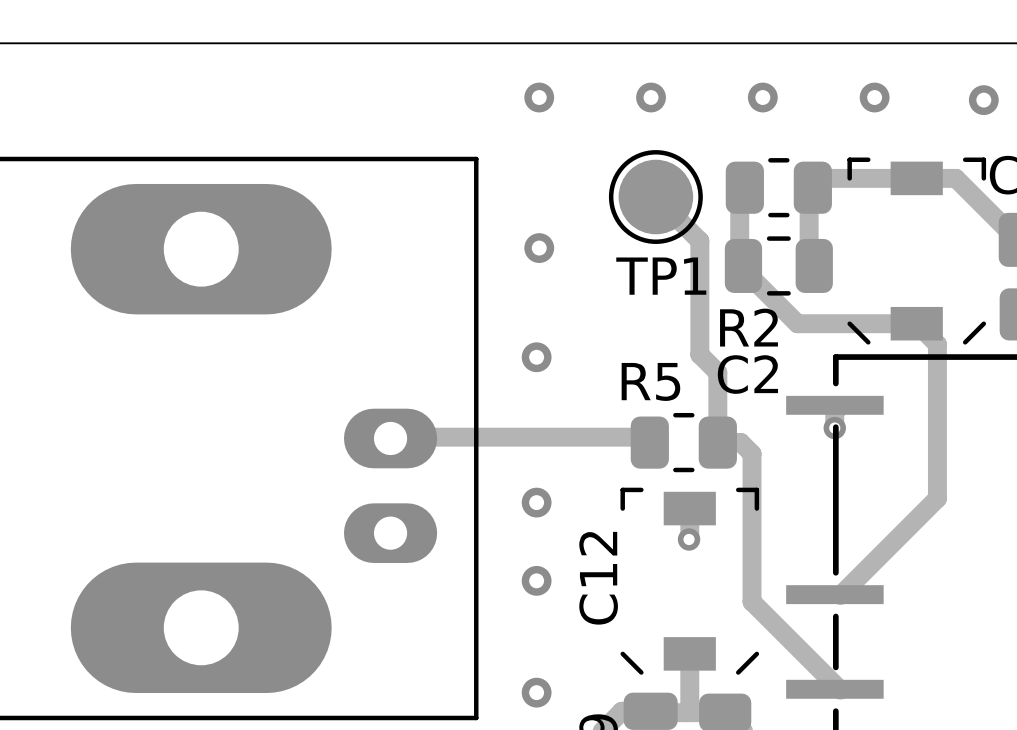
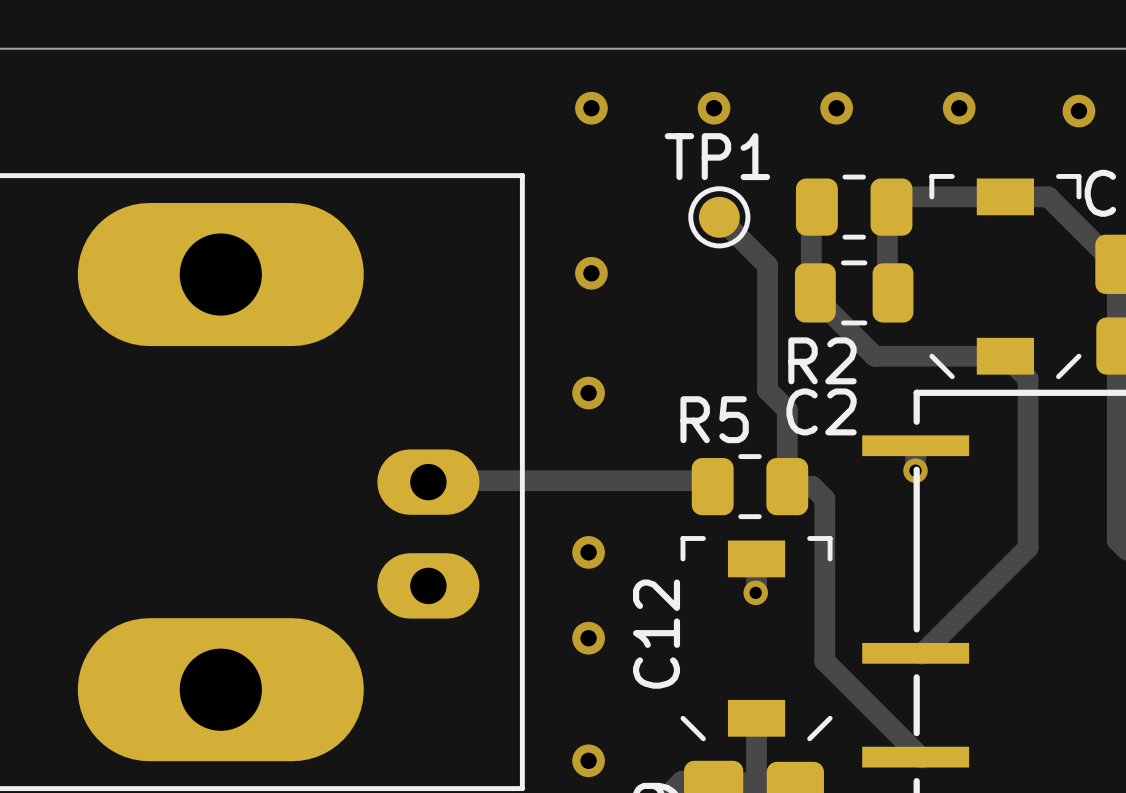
TP1 footprint: [608, 150, 703, 244] -> [688, 186, 751, 249]
TP1 name position: TP1 (661, 276) -> TP1 (717, 156)

